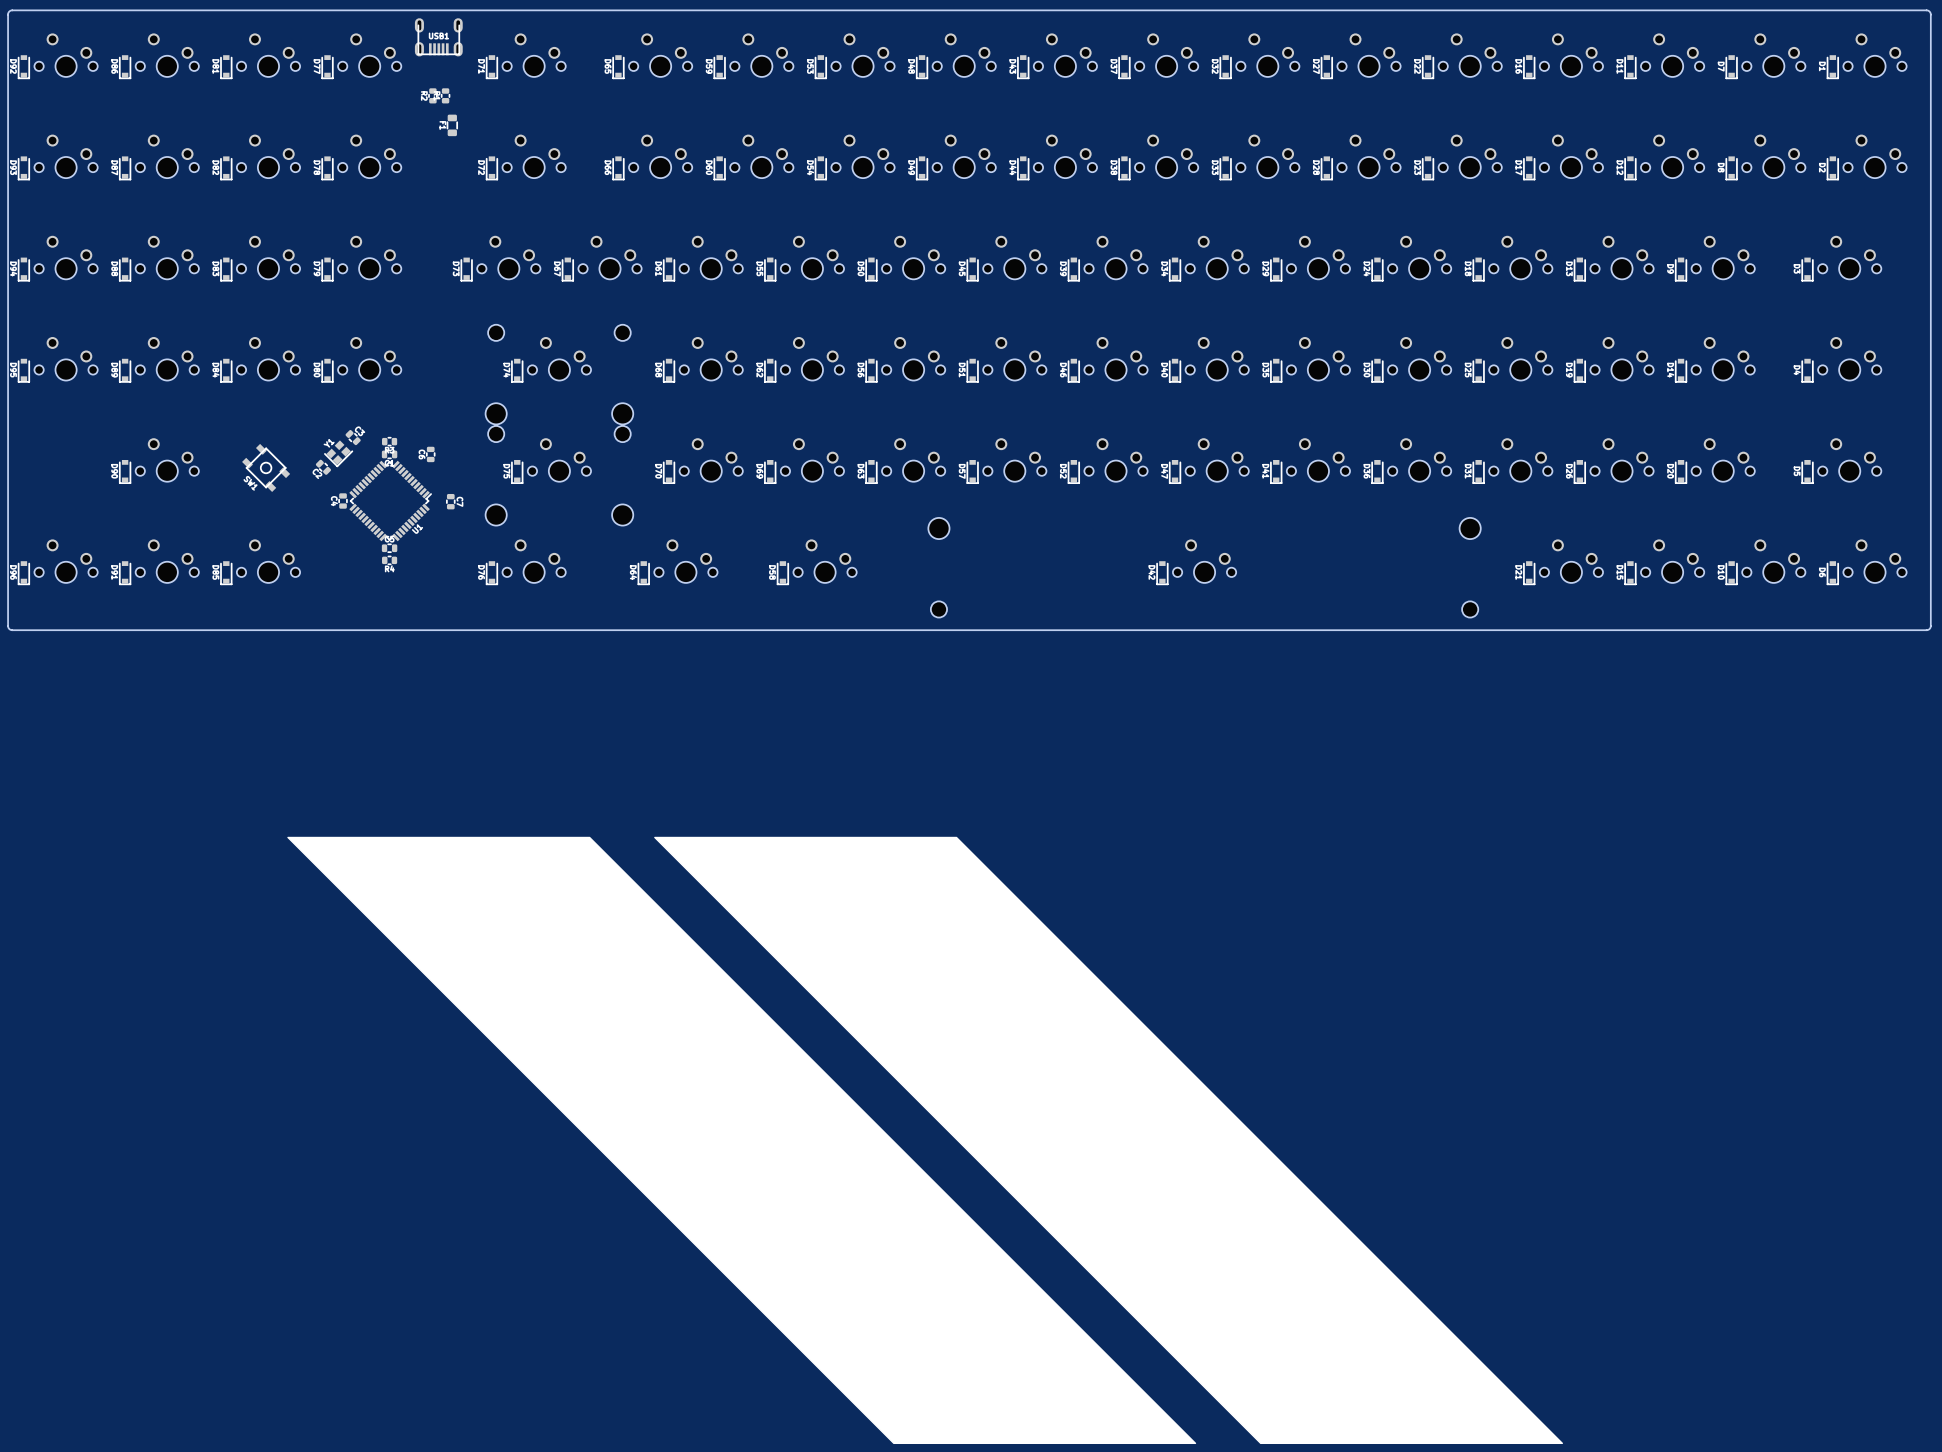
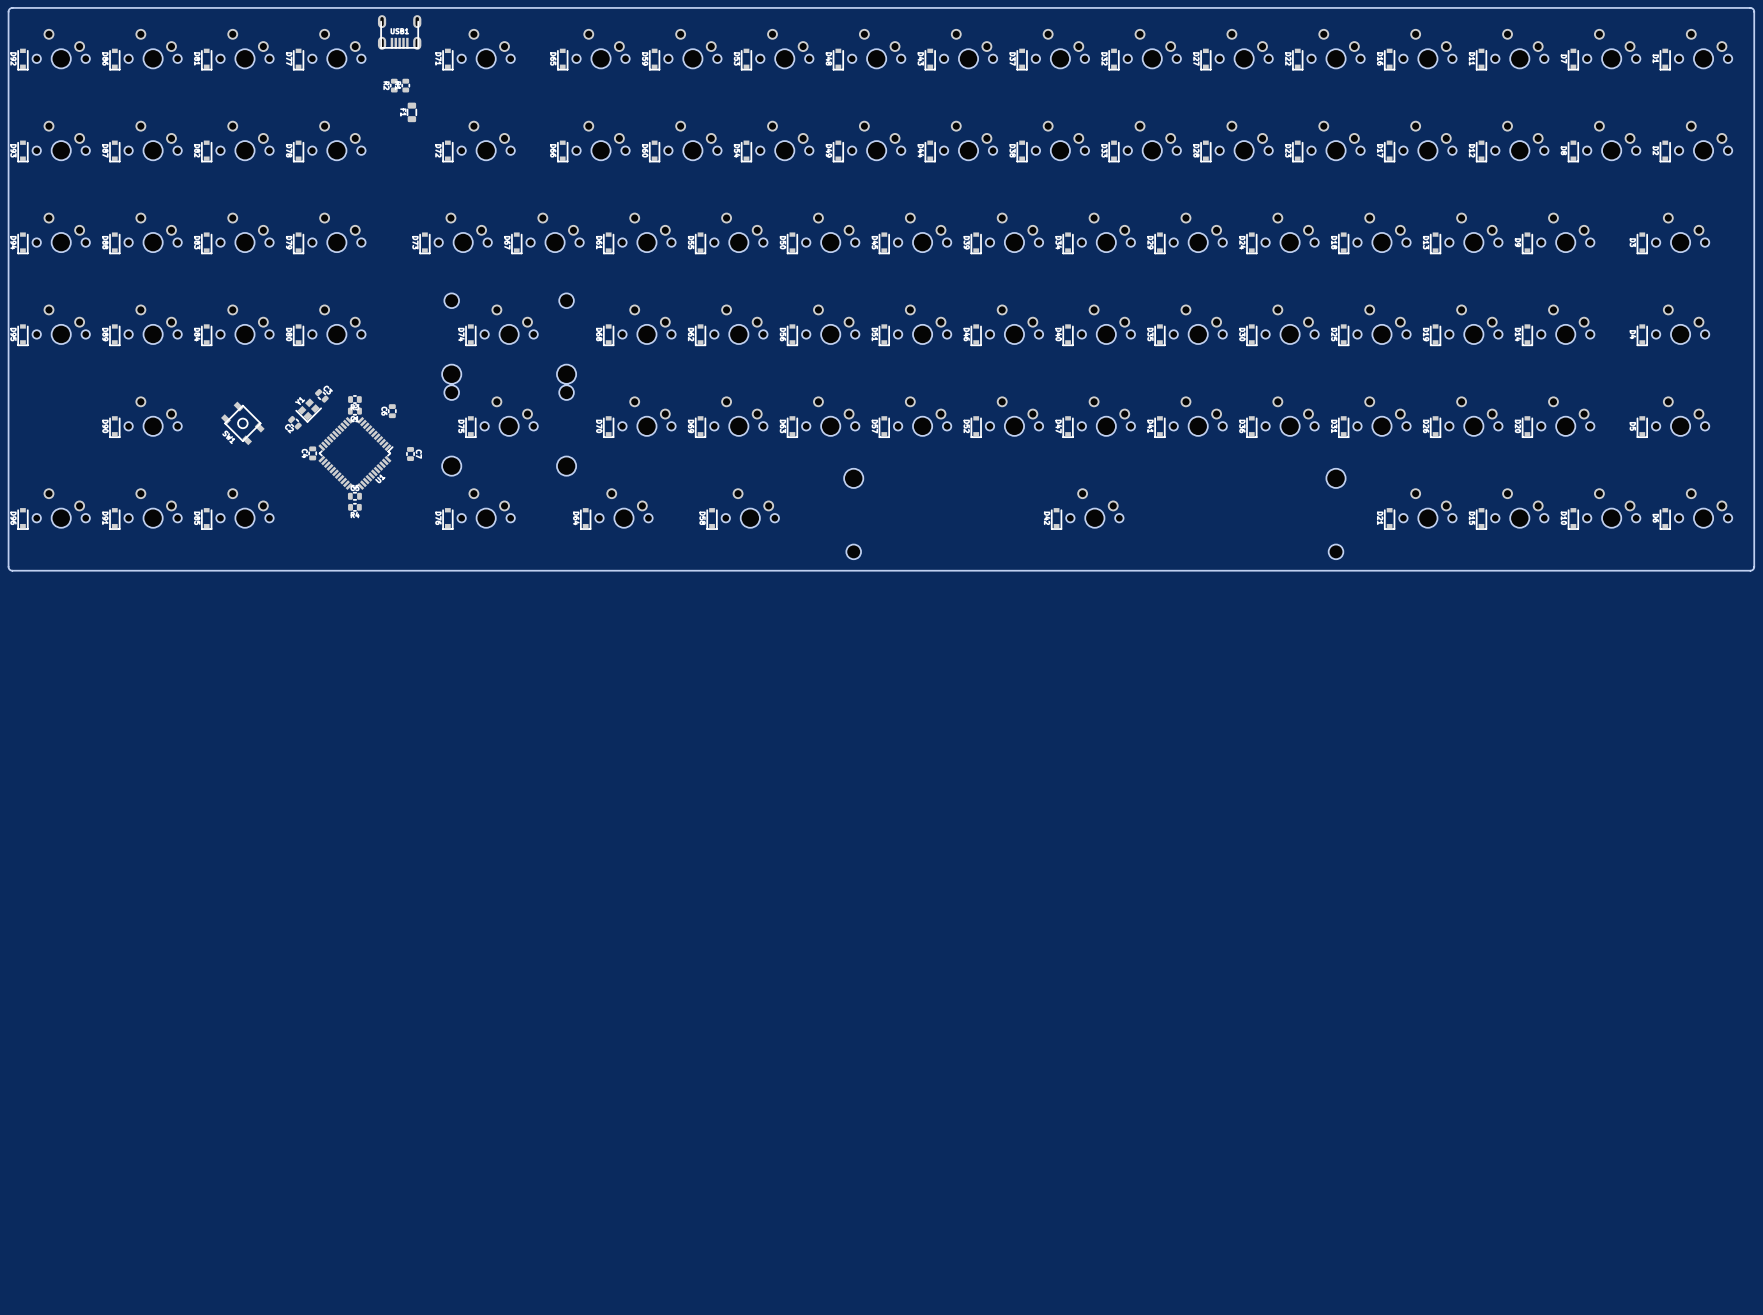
drawing: [287, 836, 1564, 1445] -> none

